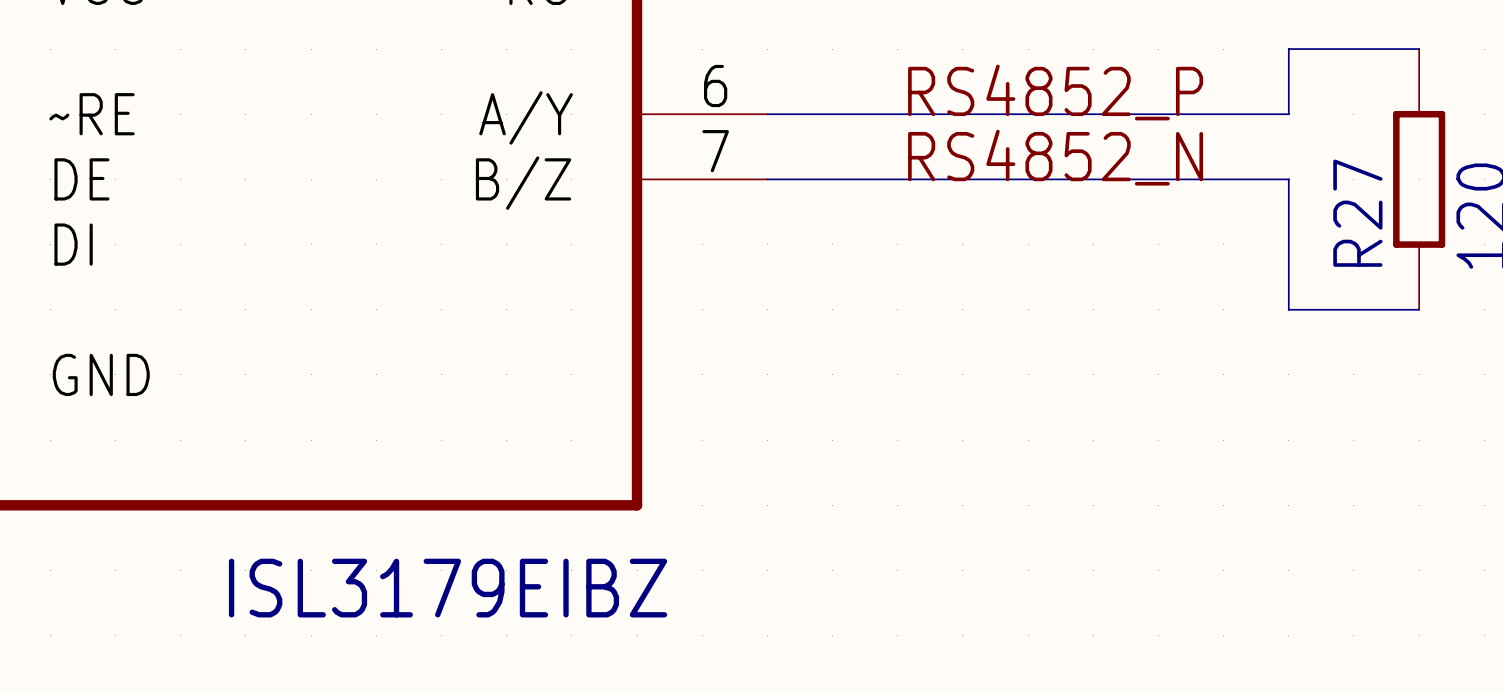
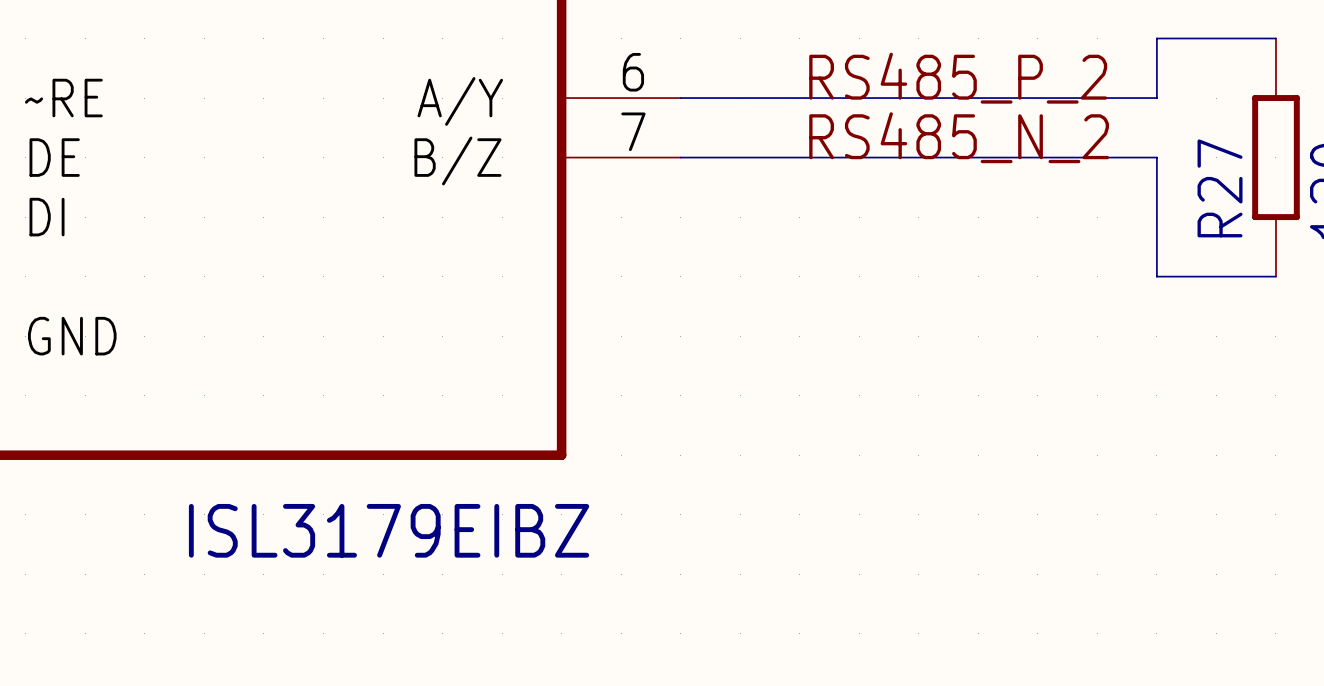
label: RS4852_P (1055, 92) -> RS485_P_2 (958, 78)
label: RS4852_N (1055, 157) -> RS485_N_2 (959, 137)

